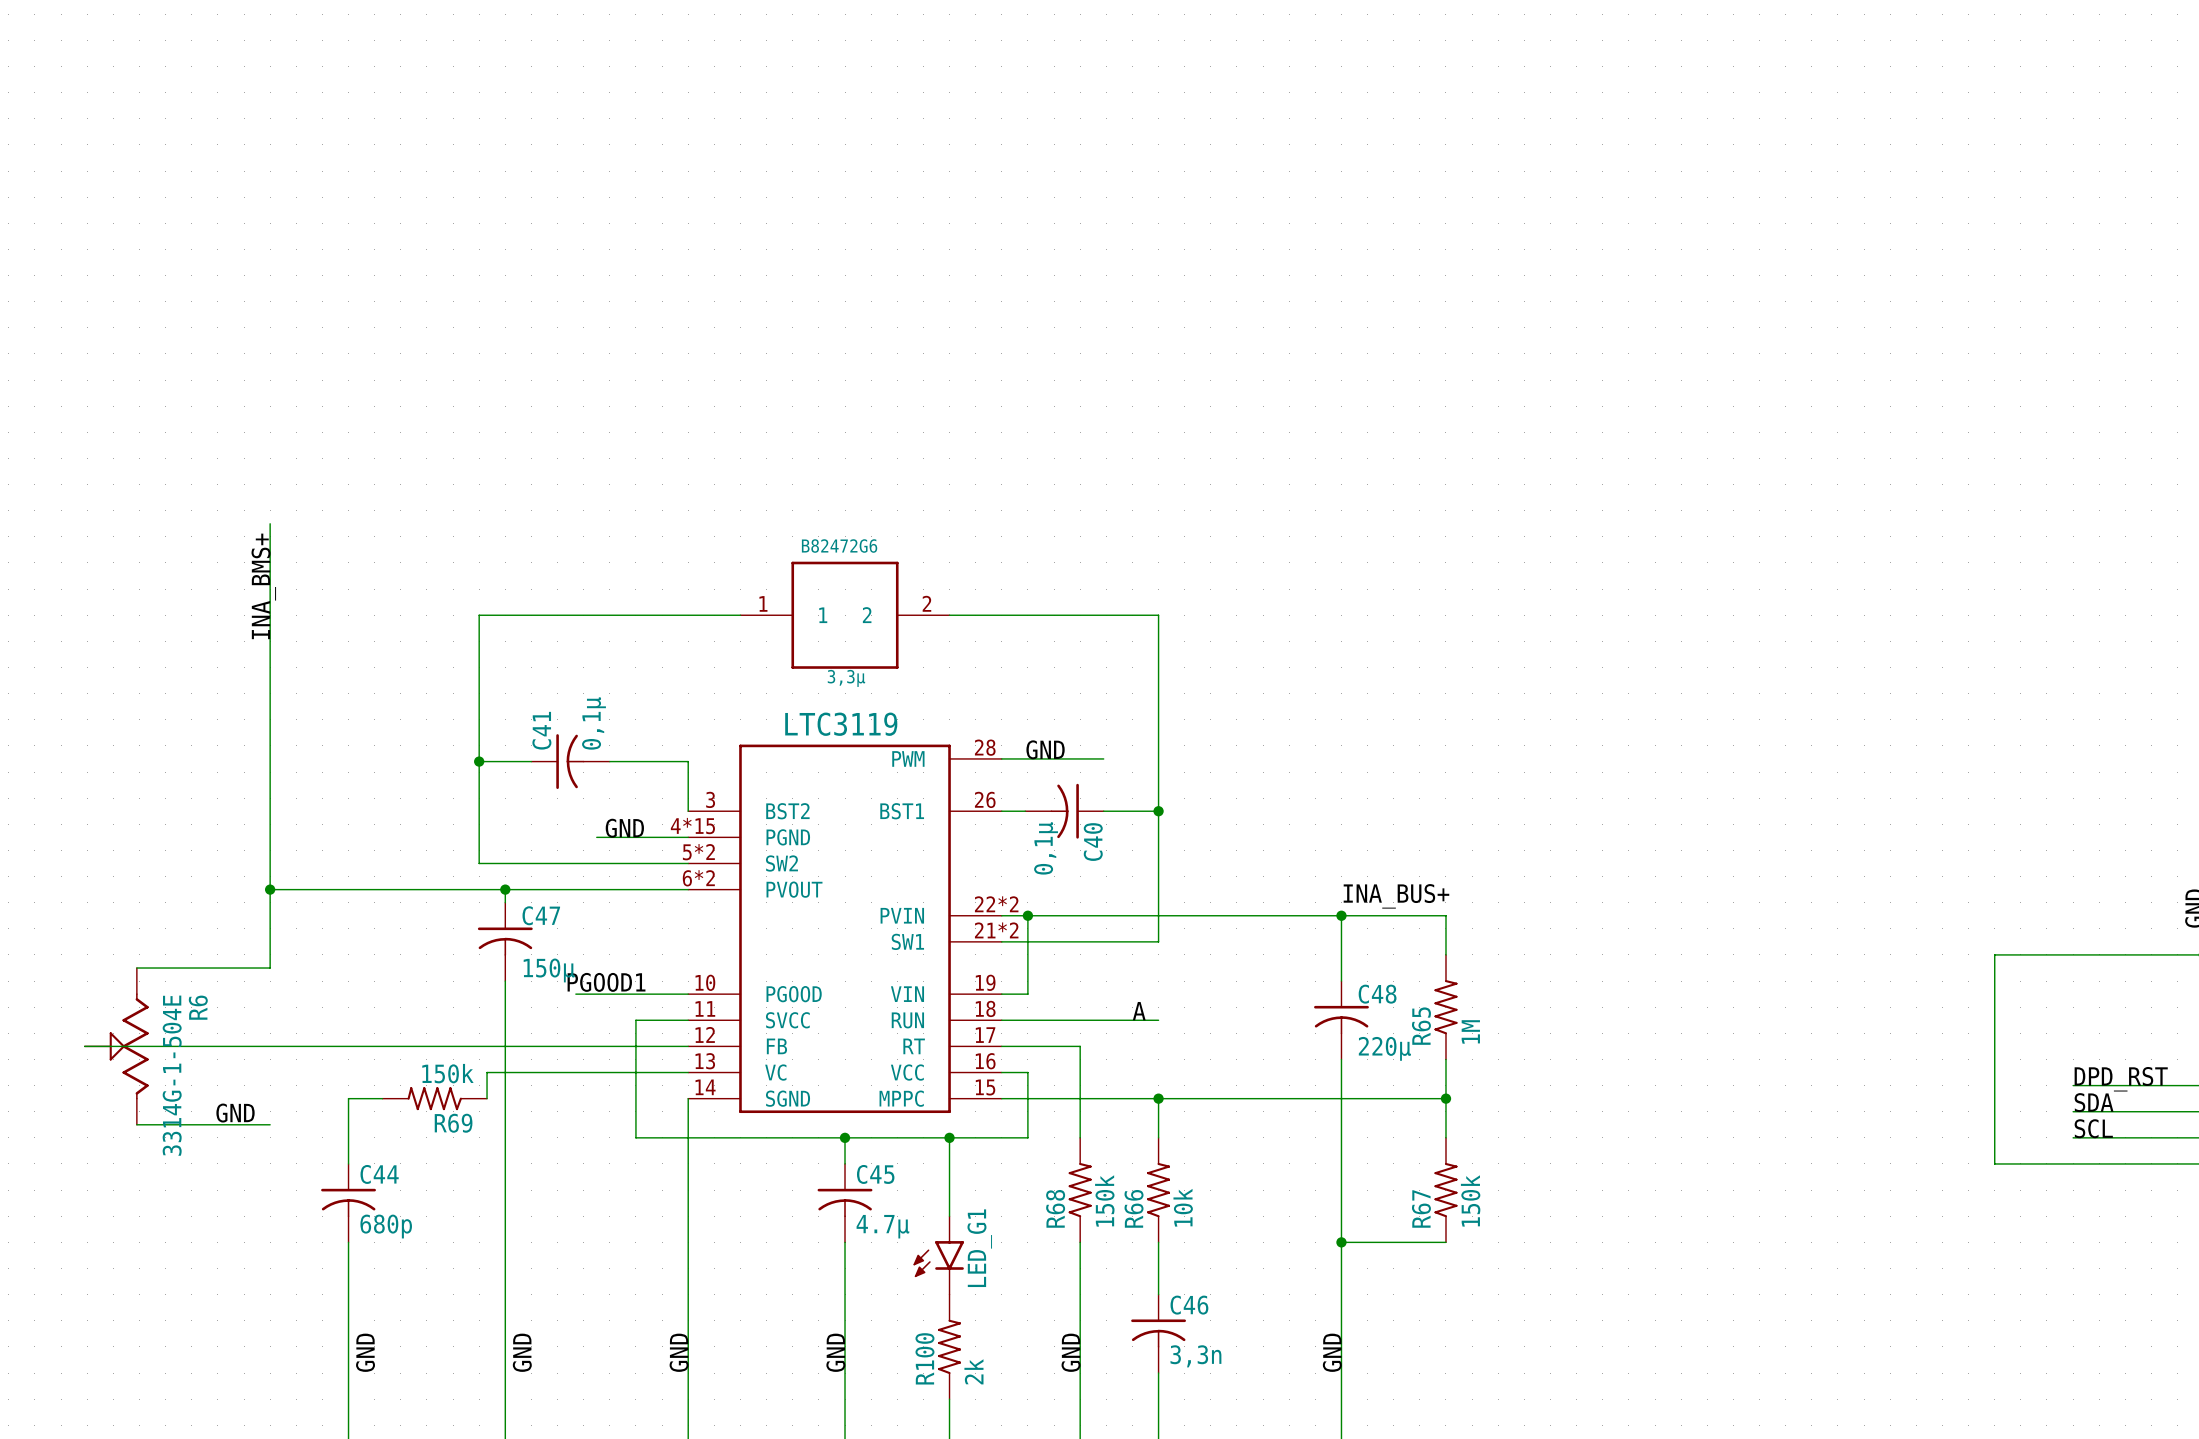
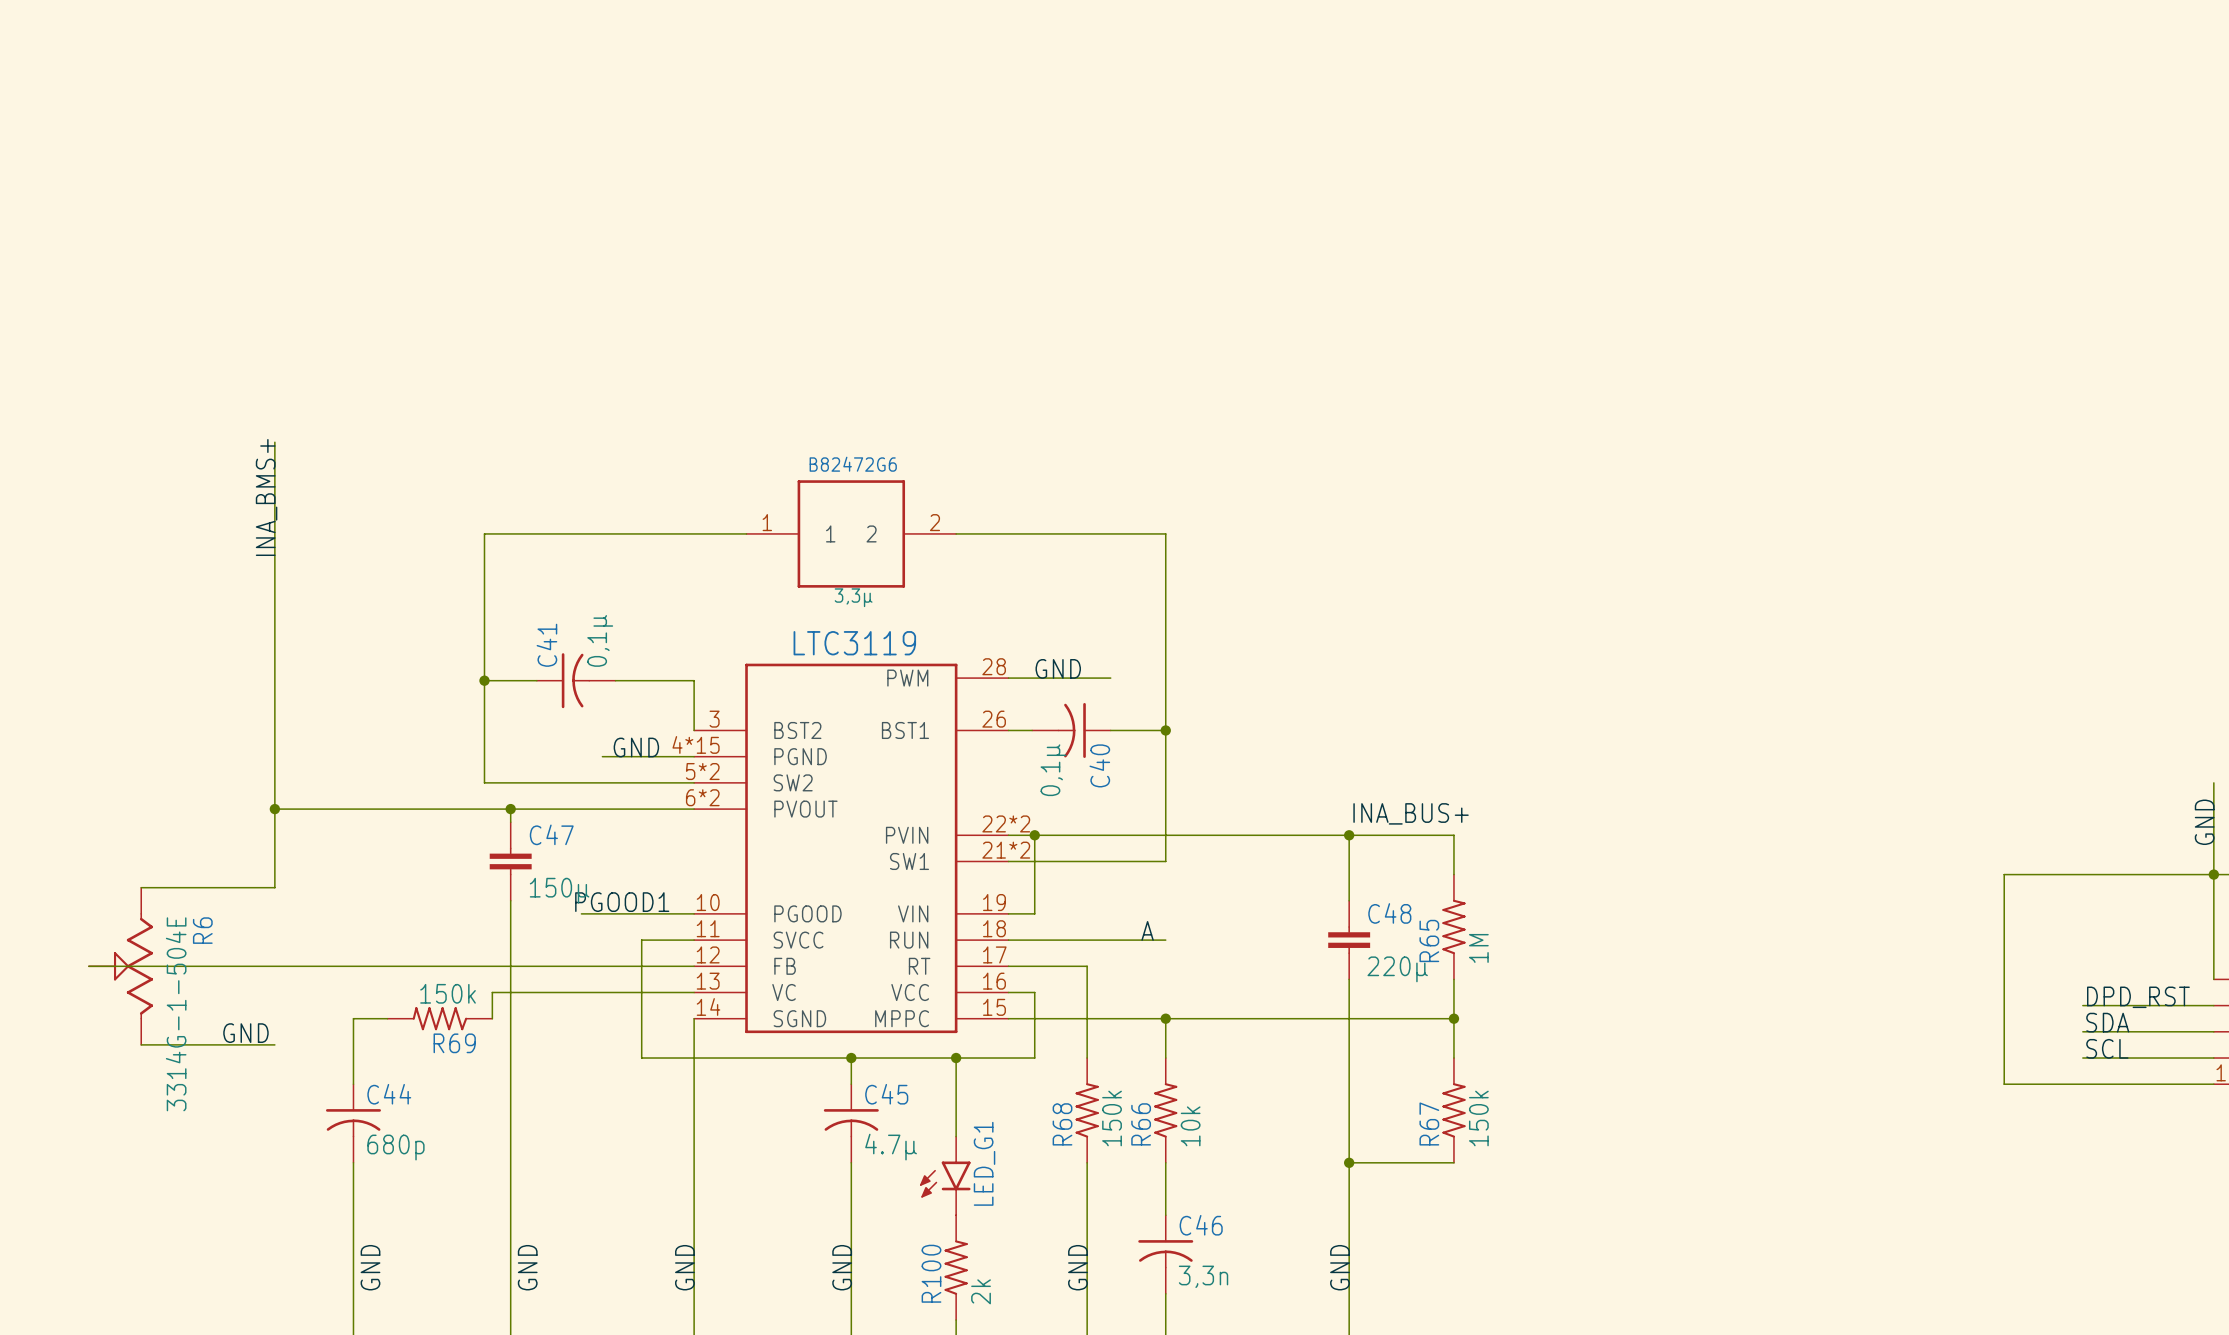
C47 symbol: [477, 902, 533, 982] -> [489, 822, 532, 901]
C48 symbol: [1314, 981, 1369, 1060] -> [1328, 900, 1371, 980]

